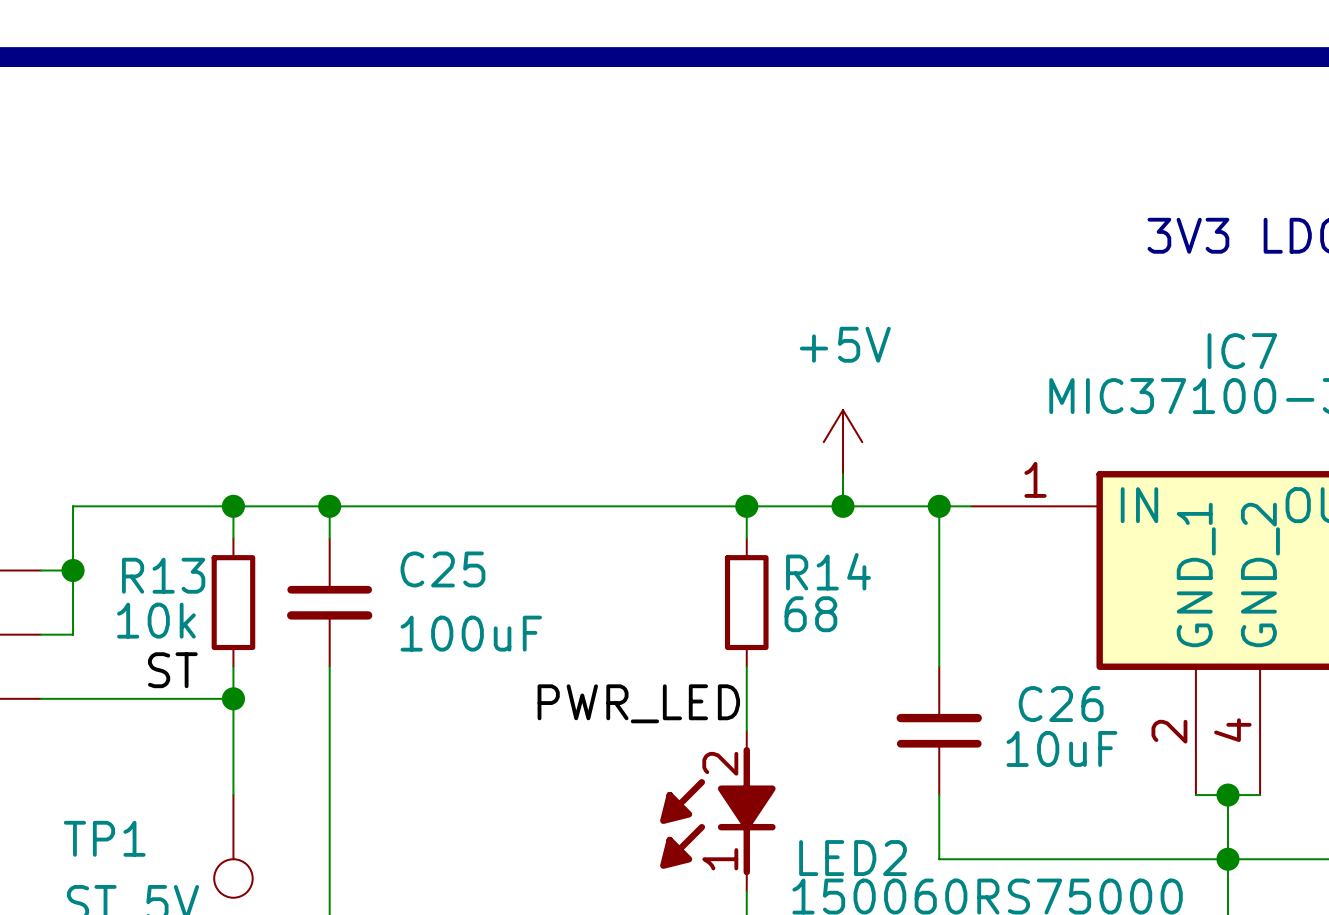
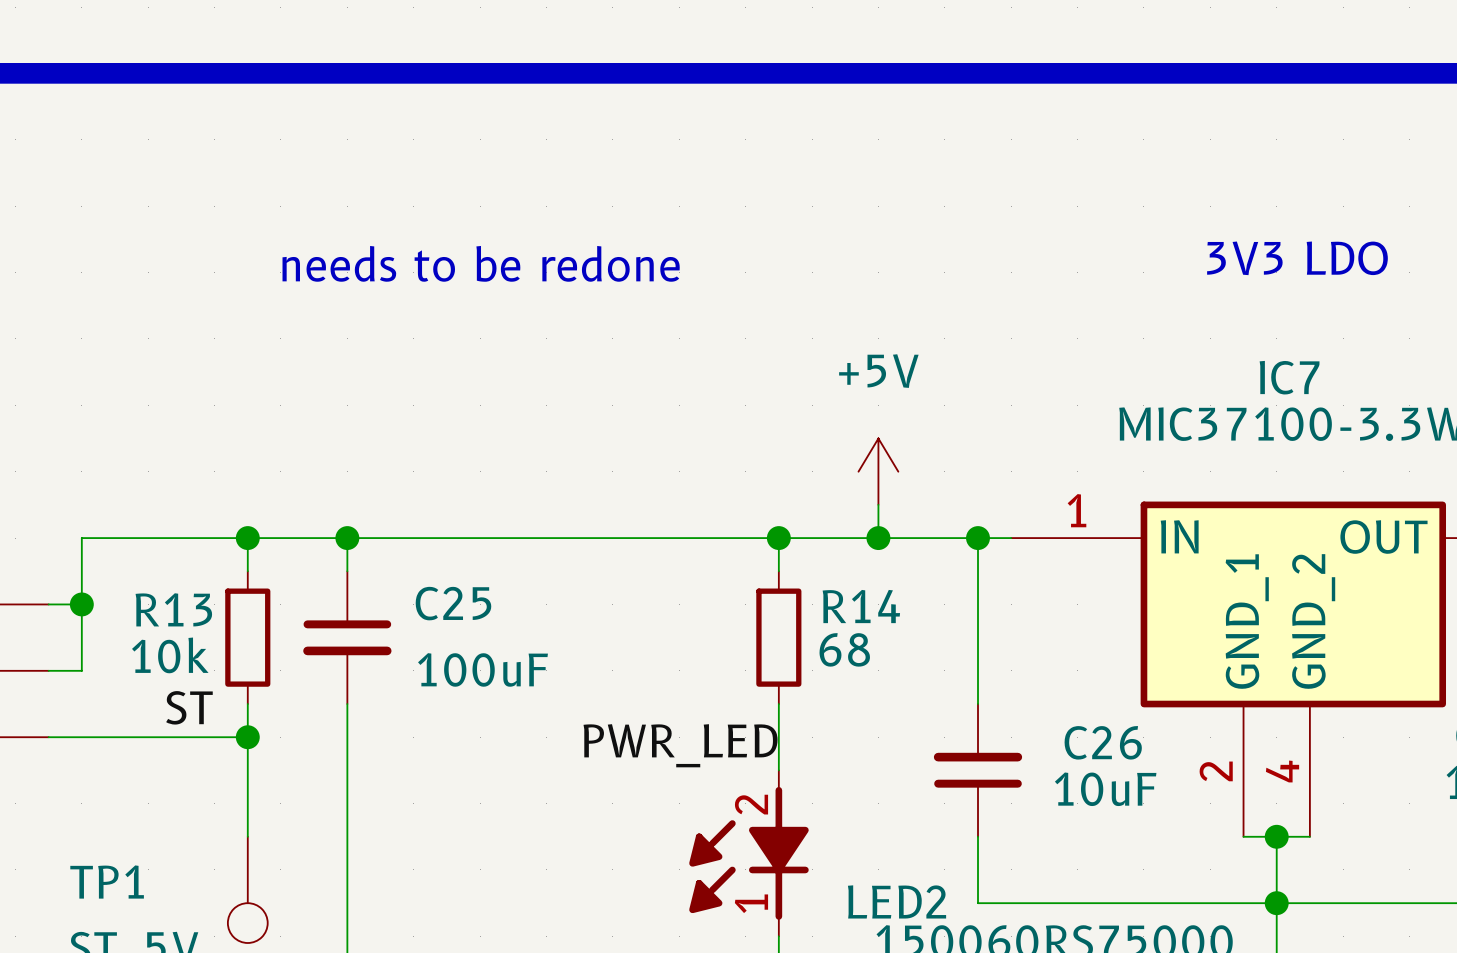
text: none -> needs to be redone (481, 263)

